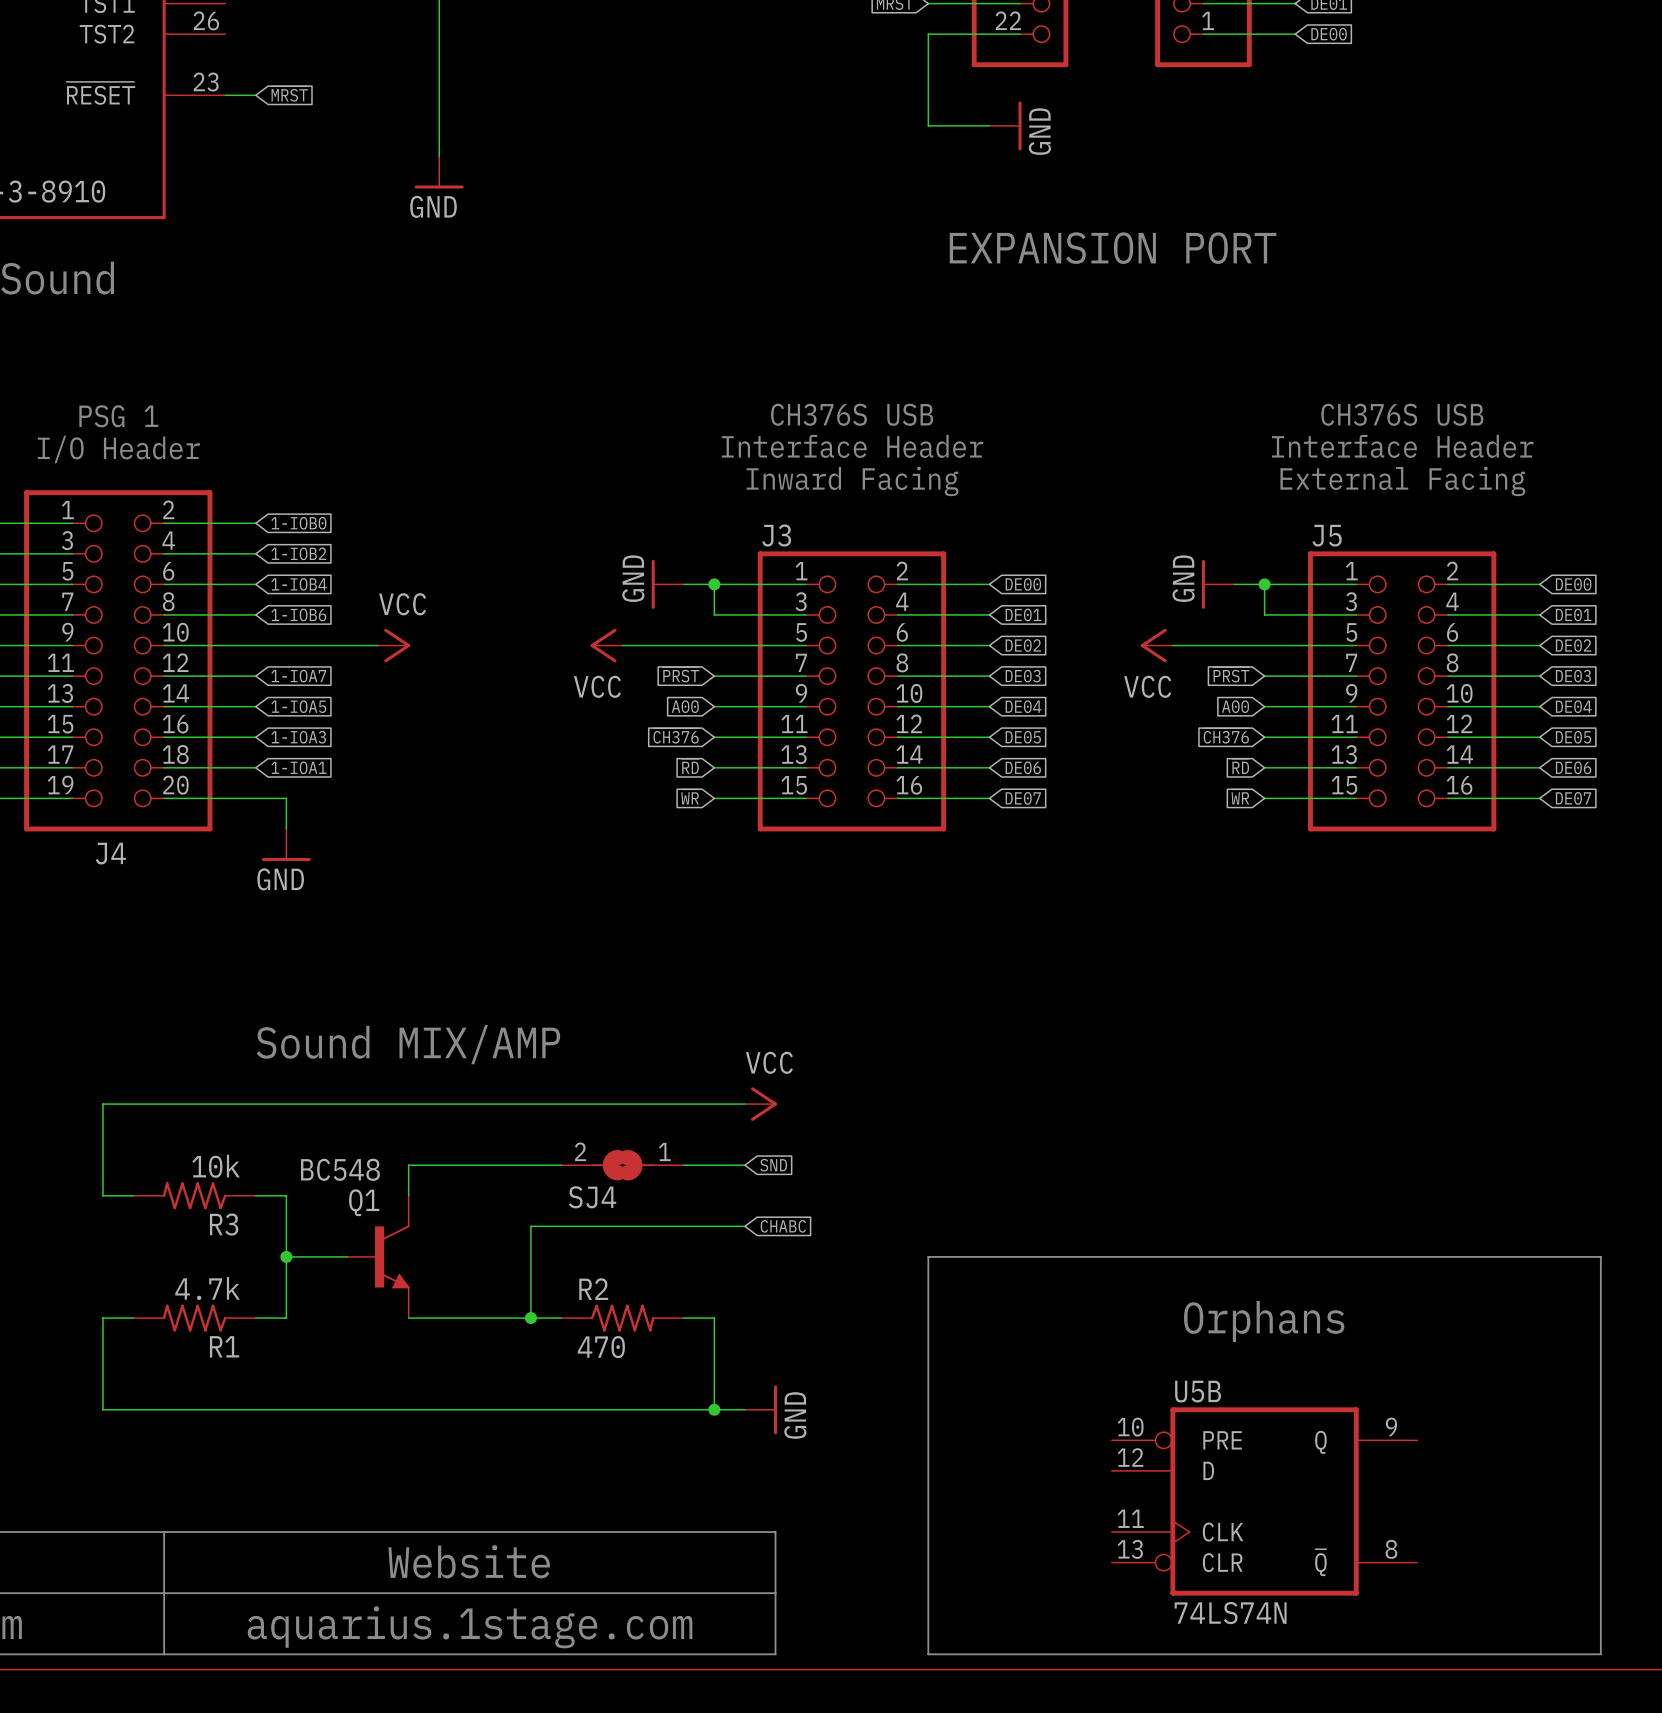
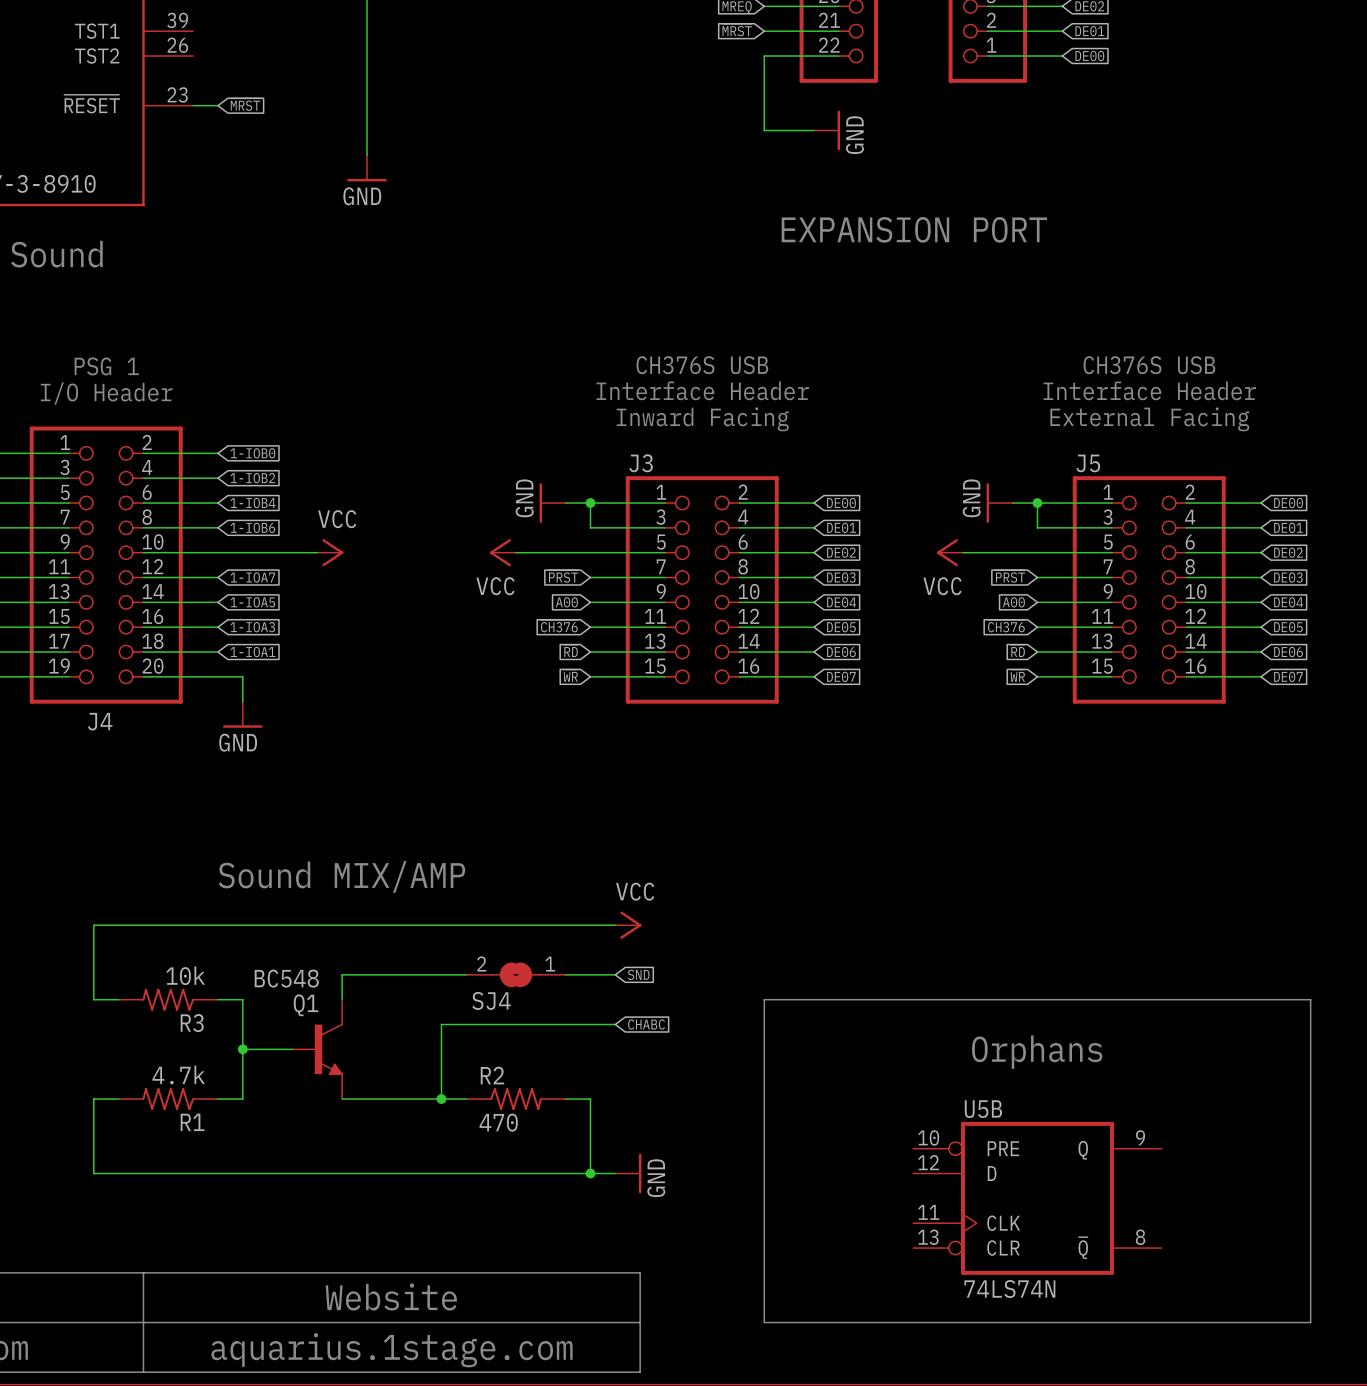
line: (928, 1256) (1600, 1256) -> (764, 1049) (764, 999) (1310, 999) (1310, 1049)
text position: Orphans (1264, 1321) -> Orphans (1037, 1052)
U5B position: (1264, 1501) -> (1037, 1198)
line: (928, 1593) (928, 1654) (1600, 1654) (1600, 1593) -> (764, 1322) (1310, 1322)

